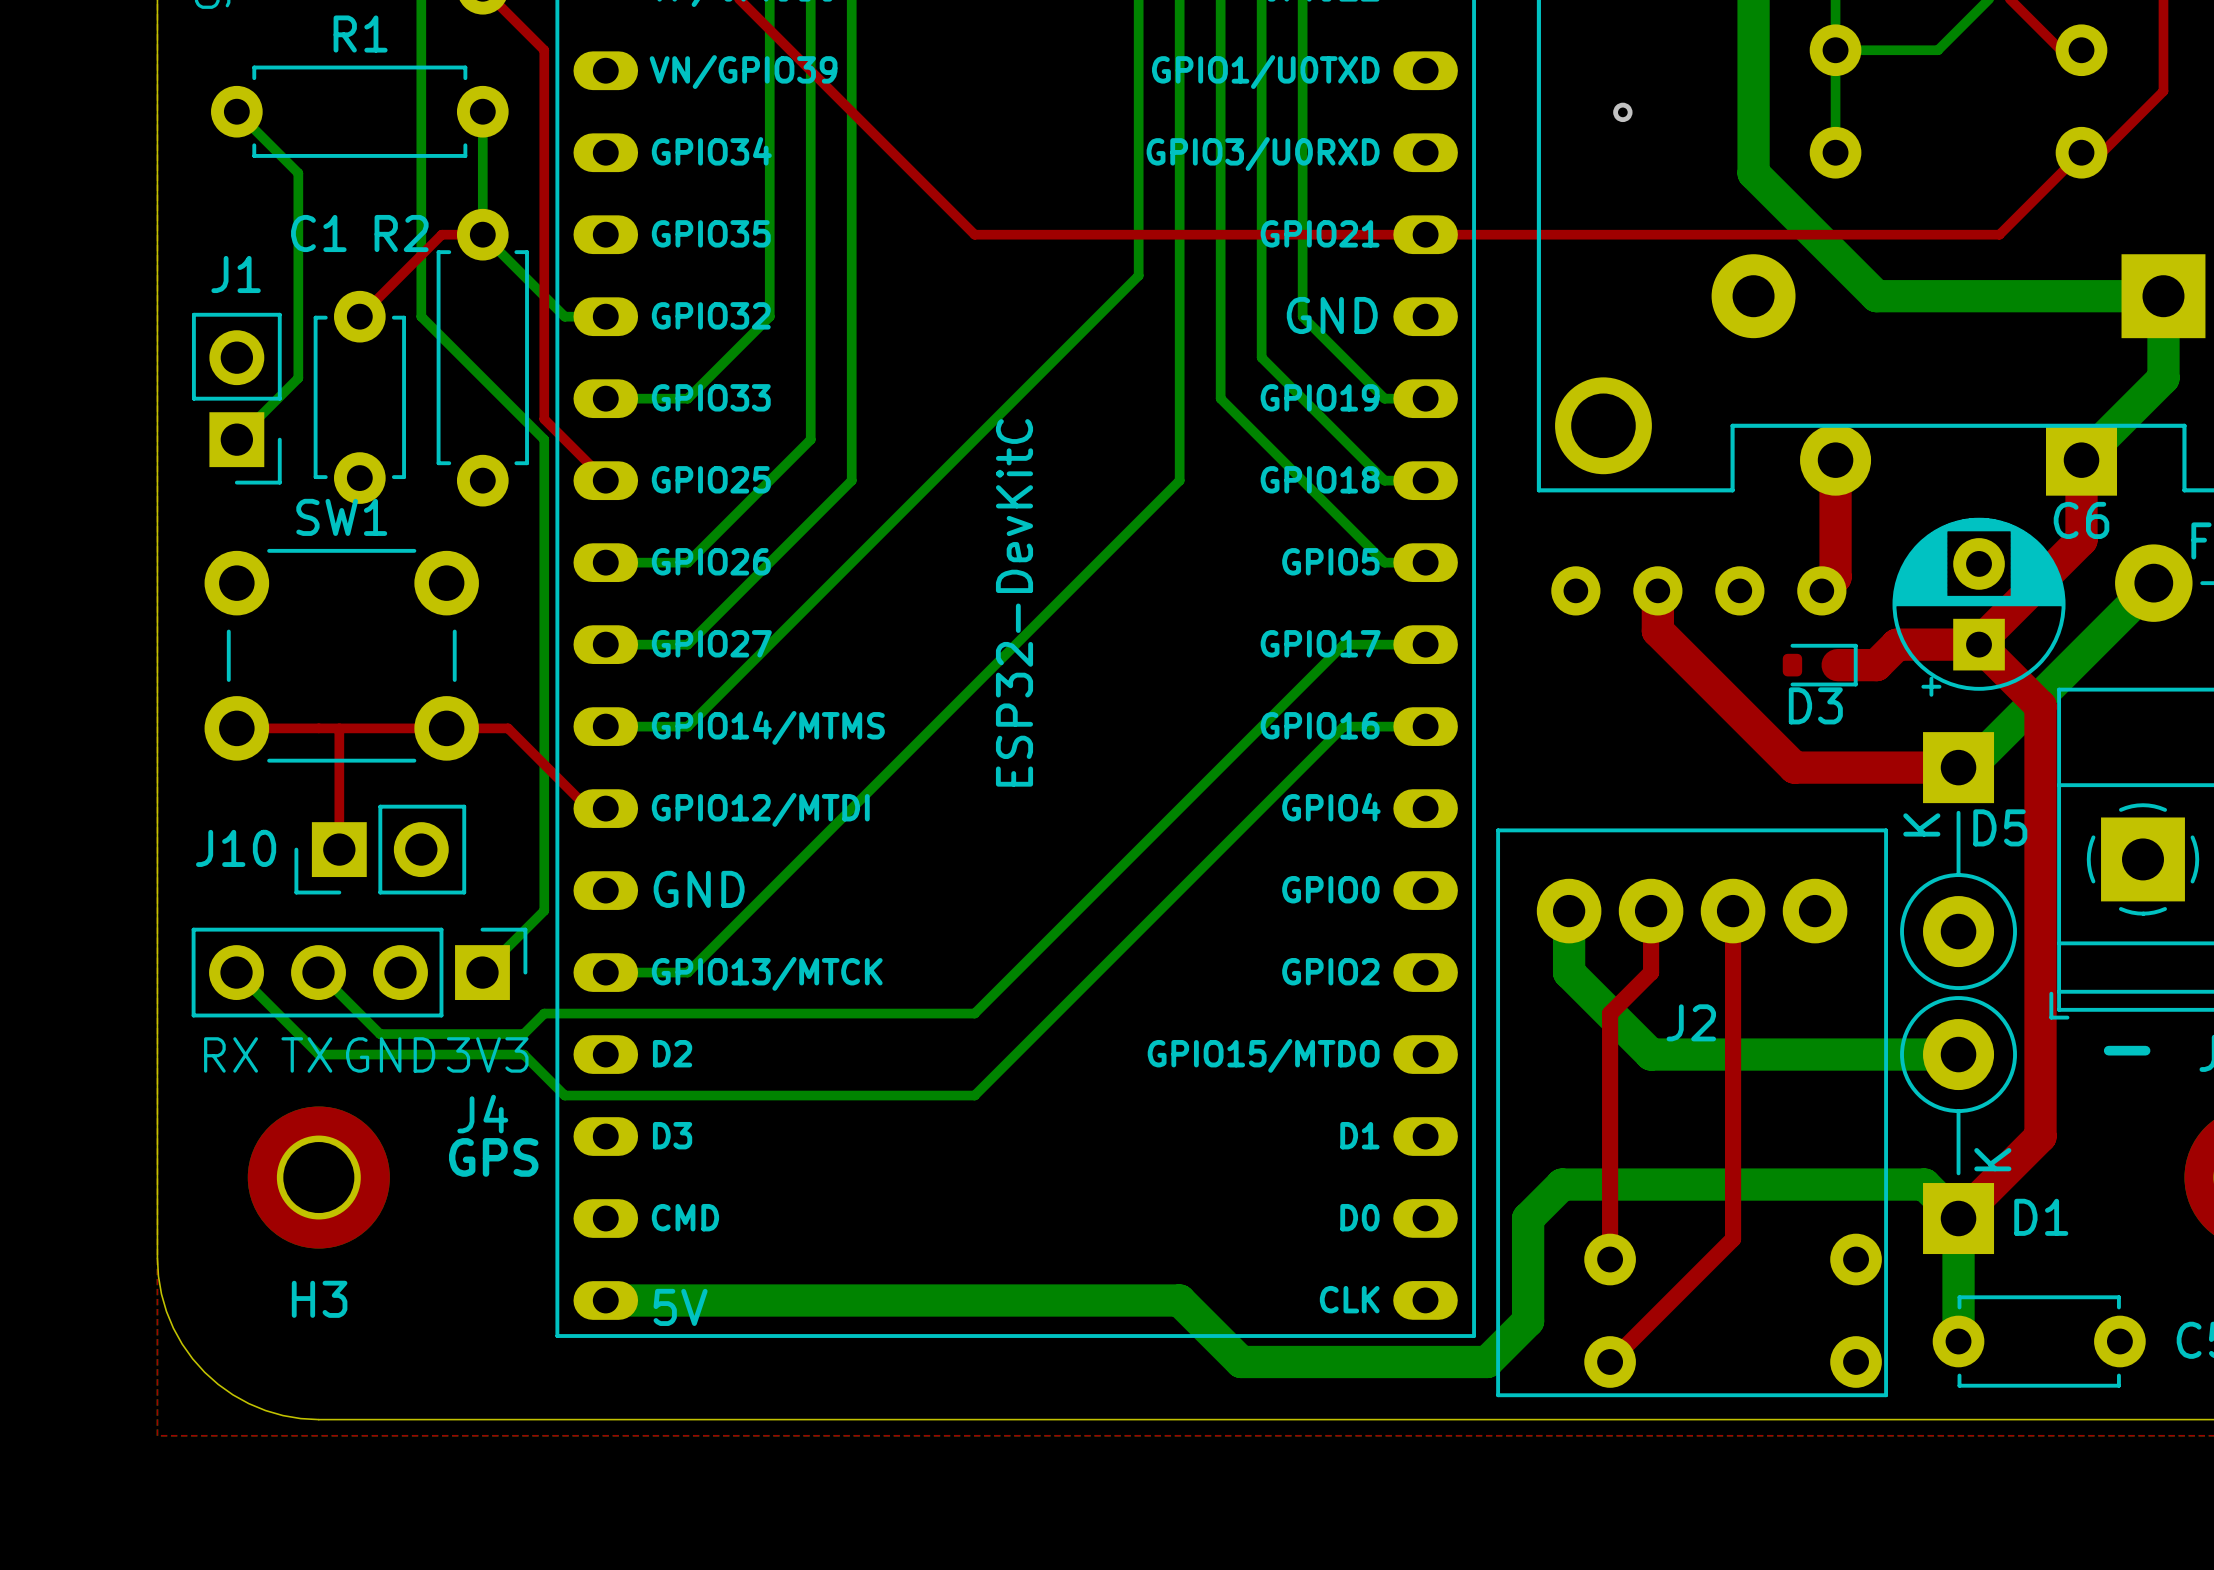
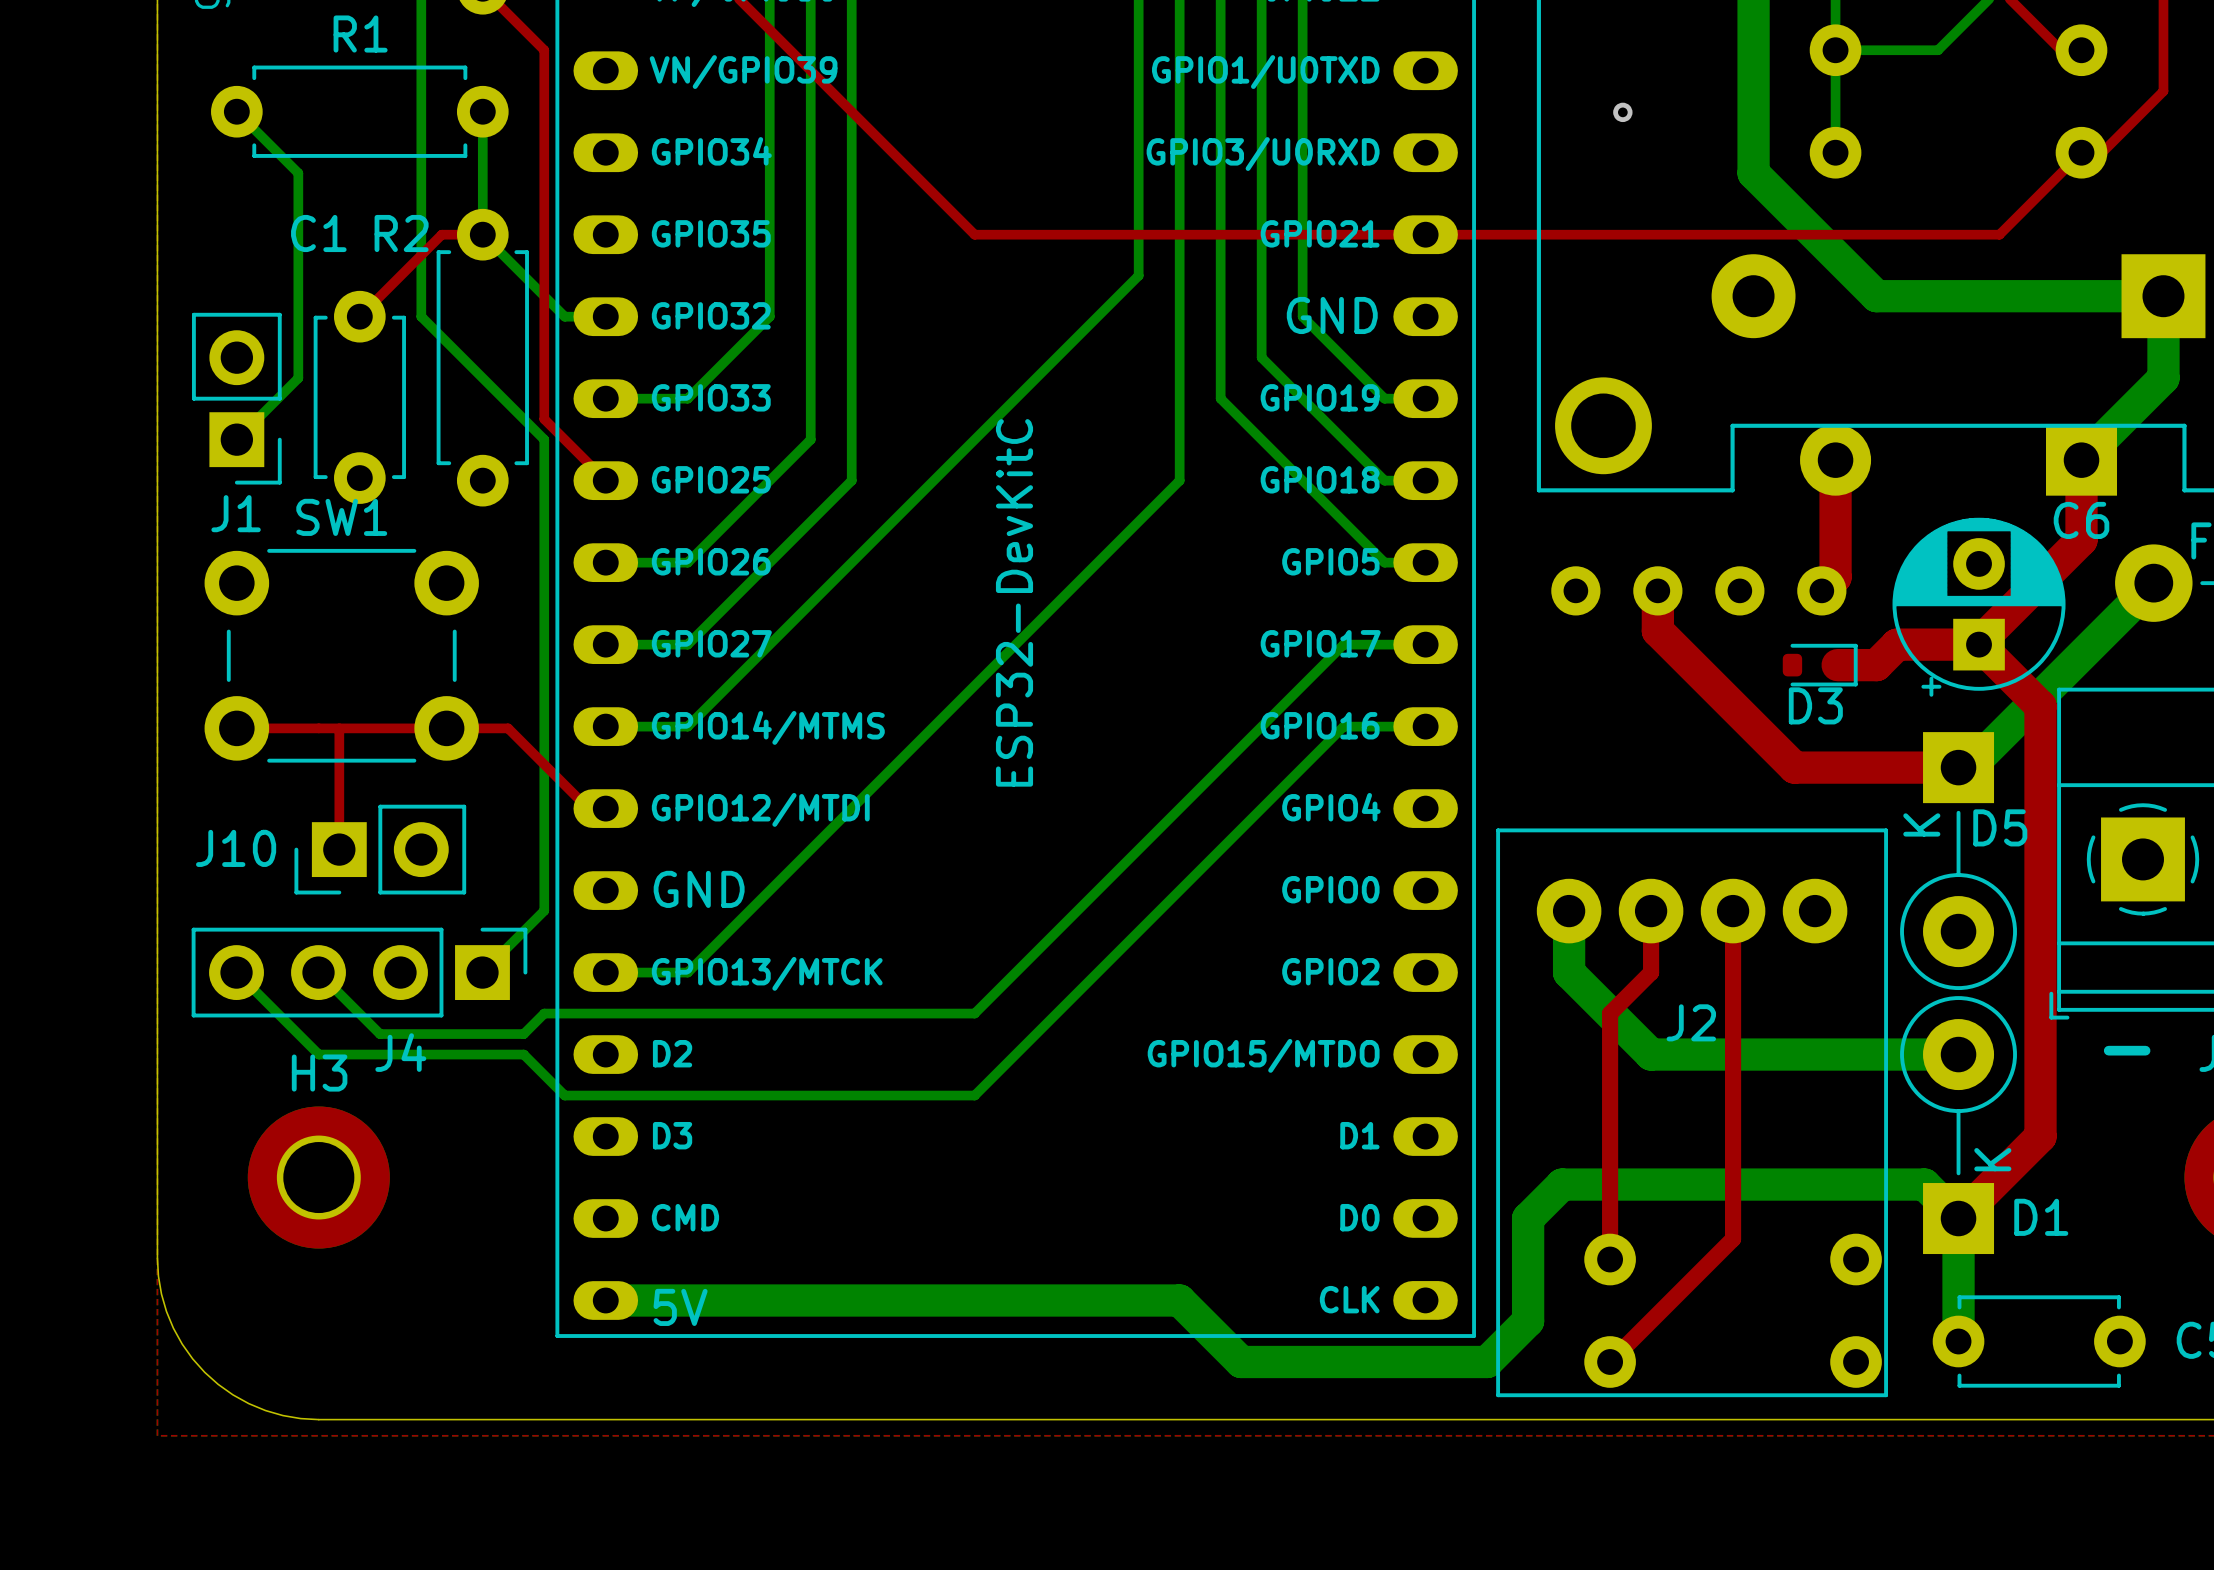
J1 name position: J1 (236, 274) -> J1 (236, 513)
text: RX (231, 1054) -> none
text: TX (306, 1054) -> none
text: GND (390, 1054) -> none
text: 3V3 (487, 1054) -> none
J4 name position: J4 (482, 1114) -> J4 (400, 1052)
text: GPS (493, 1157) -> none
H3 name position: H3 (319, 1299) -> H3 (319, 1073)

